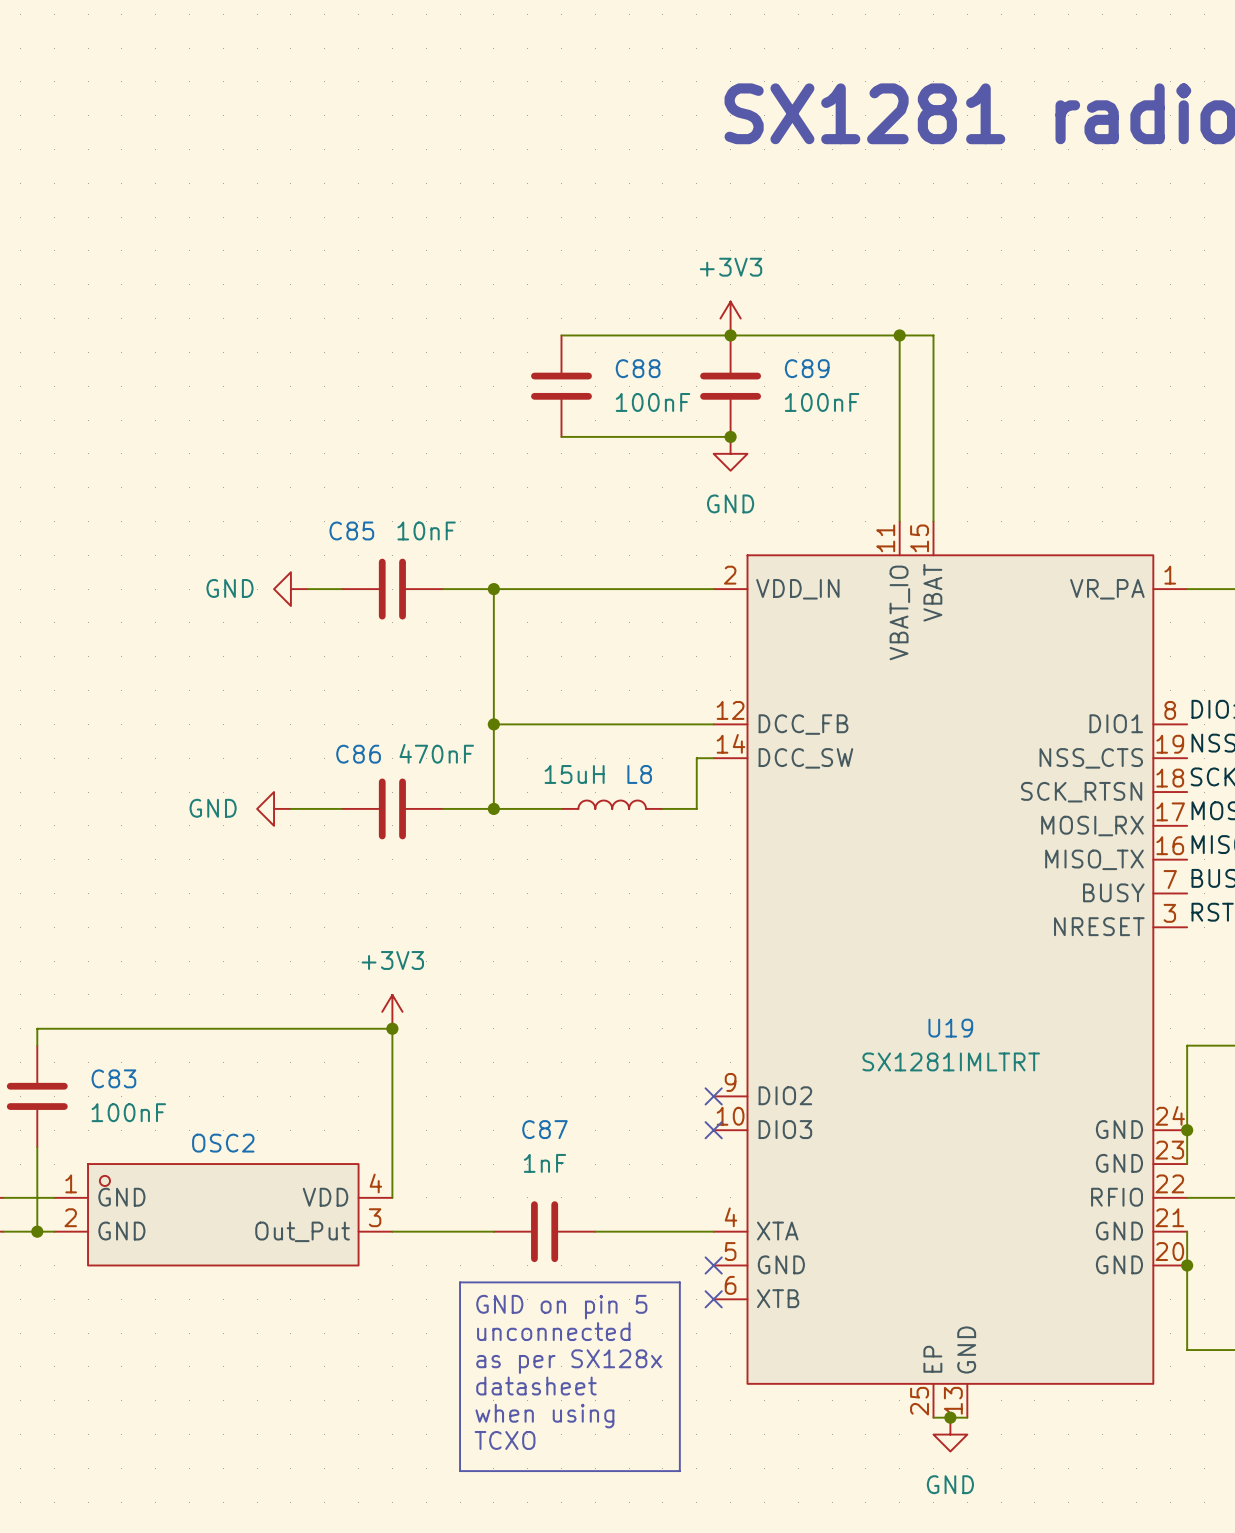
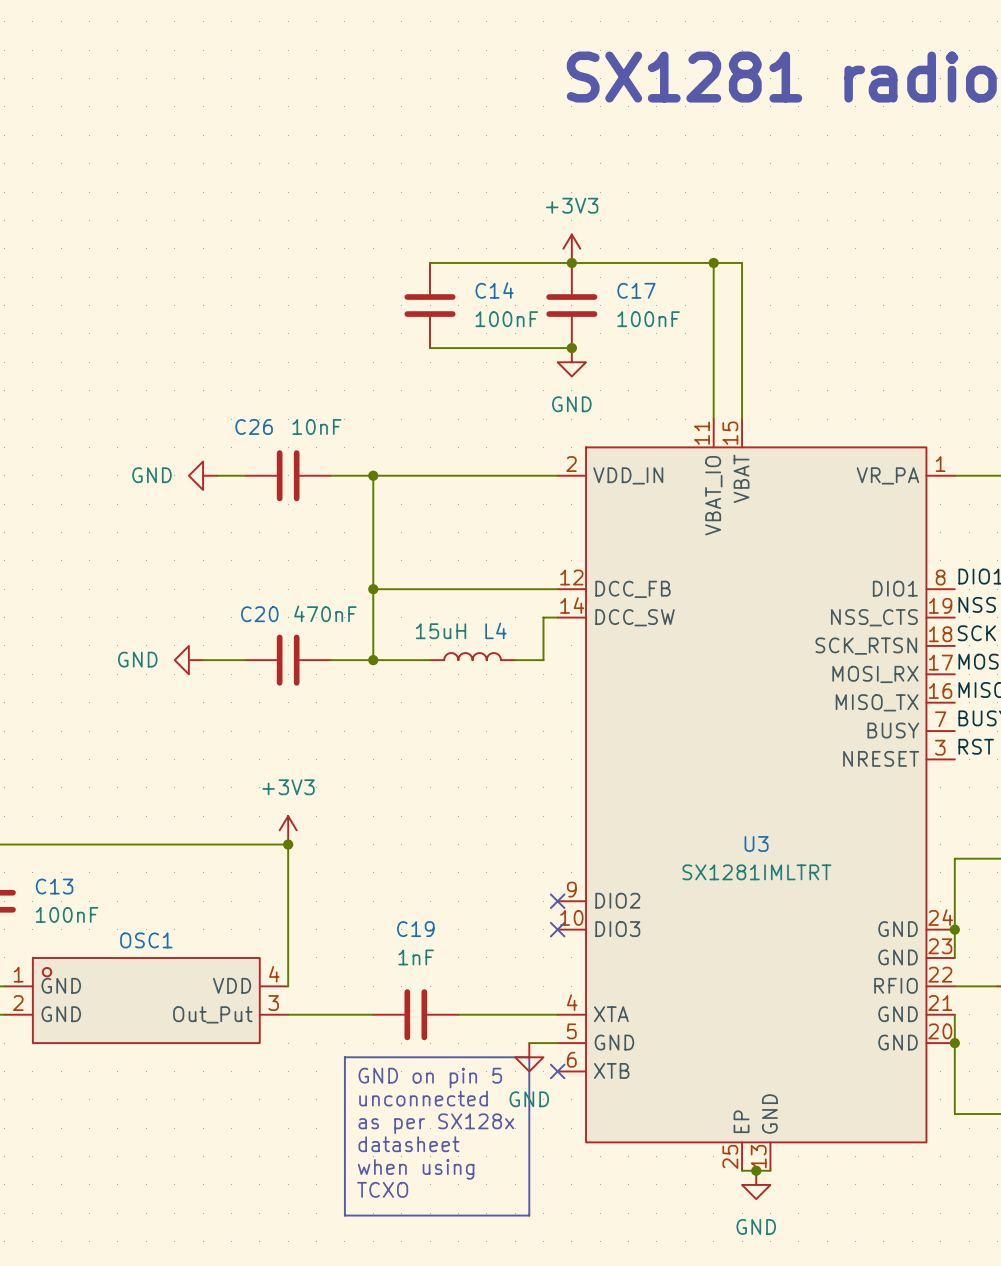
C88 name: C88 (638, 368) -> C14 (494, 290)
C89 name: C89 (807, 368) -> C17 (636, 290)
C85 name: C85 (351, 530) -> C26 (254, 426)
C86 name: C86 (358, 754) -> C20 (259, 614)
L8 name: L8 (639, 774) -> L4 (495, 630)
U19 name: U19 (950, 1028) -> U3 (756, 843)
C83 name: C83 (113, 1078) -> C13 (54, 886)
C87 name: C87 (544, 1129) -> C19 (415, 929)
OSC2 name: OSC2 (223, 1143) -> OSC1 (146, 940)
wire: none -> (529, 1043) (557, 1043)
no-connect mark: (713, 1265) -> none
power symbol: none -> GND (529, 1057)

